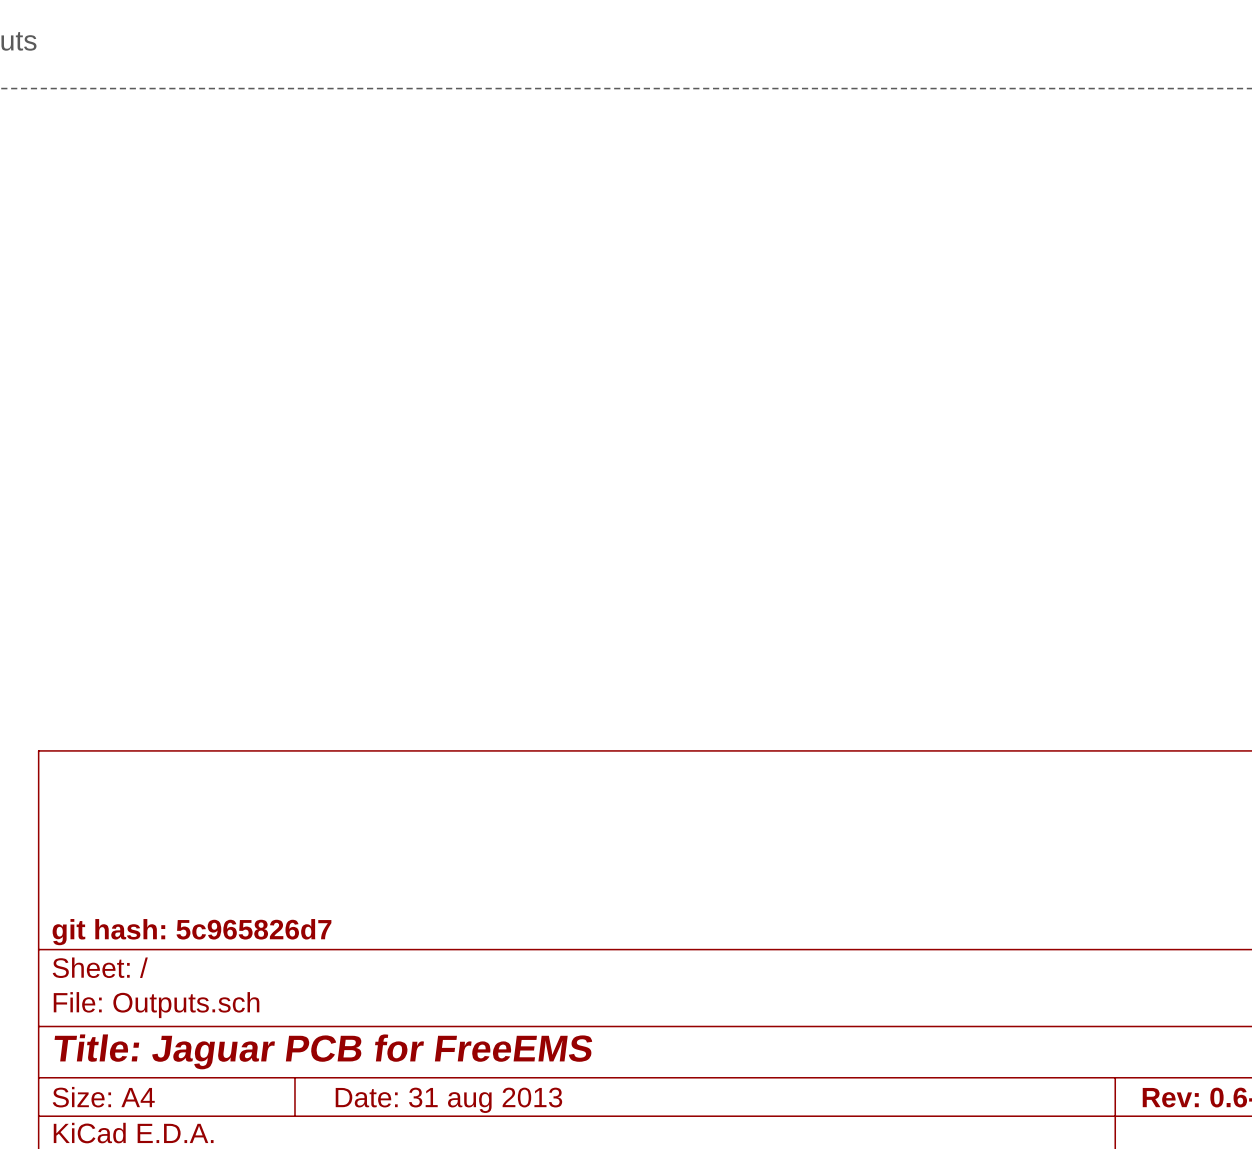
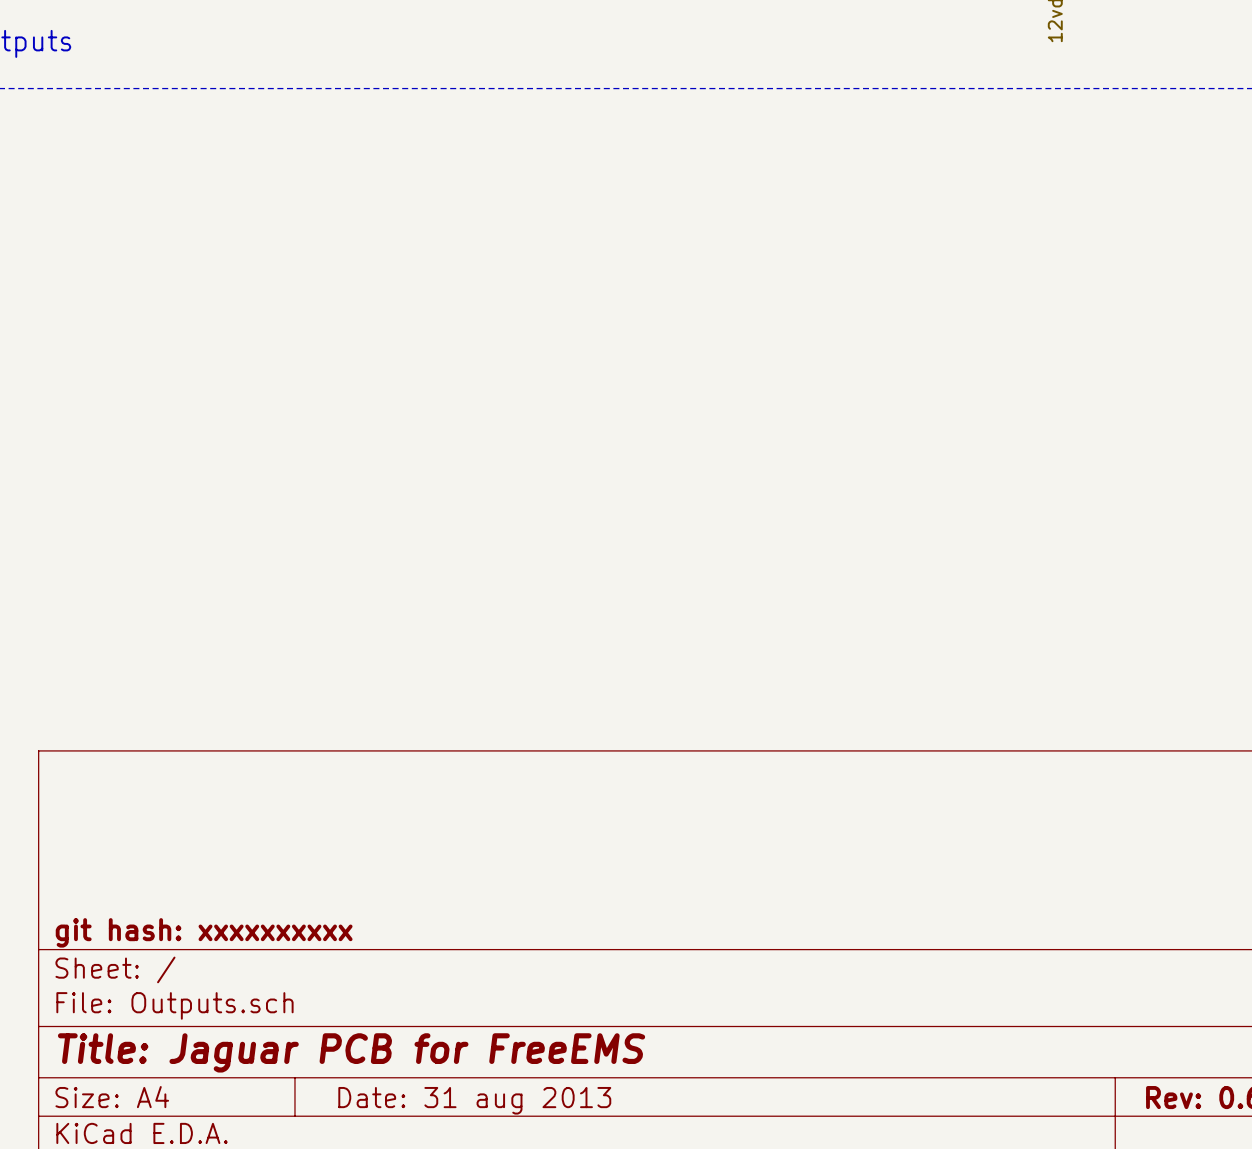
title block: git hash: 5c965826d7 (192, 932) -> git hash: xxxxxxxxxx (204, 932)

